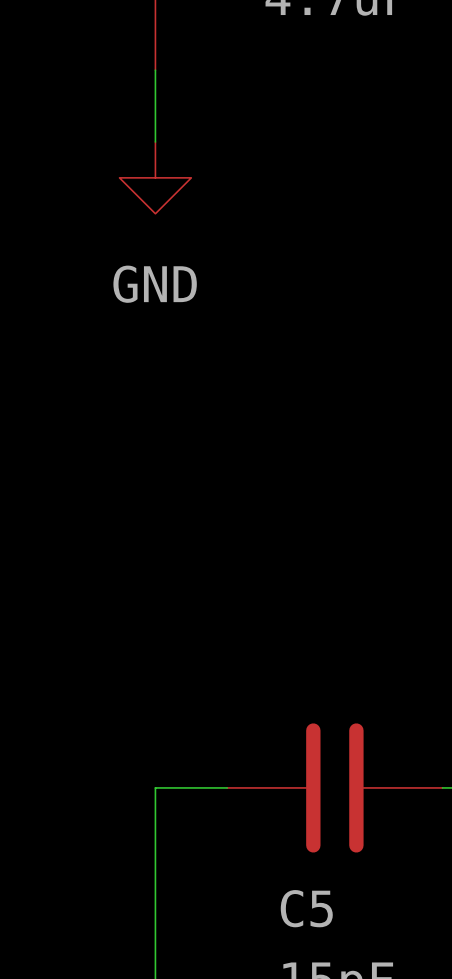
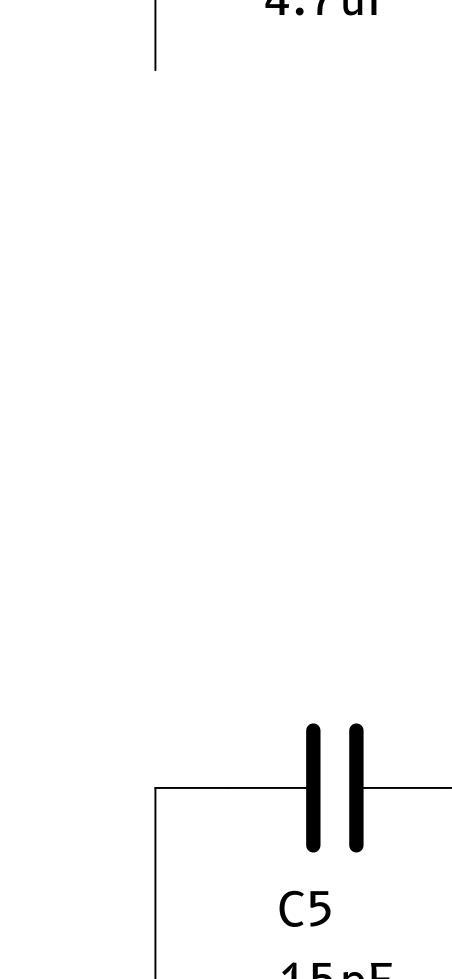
wire: (155, 70) (155, 141) -> none
power symbol: GND (155, 177) -> none

